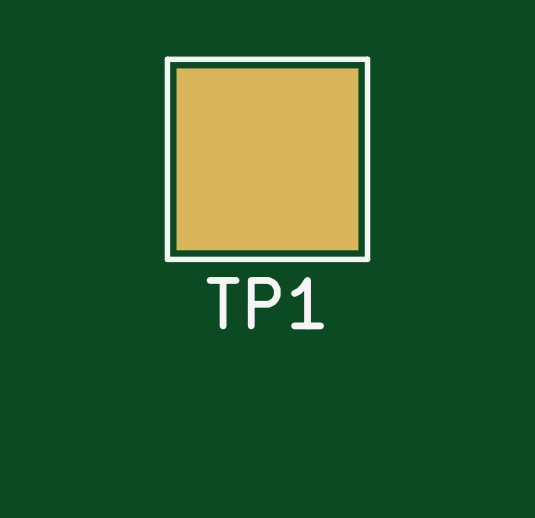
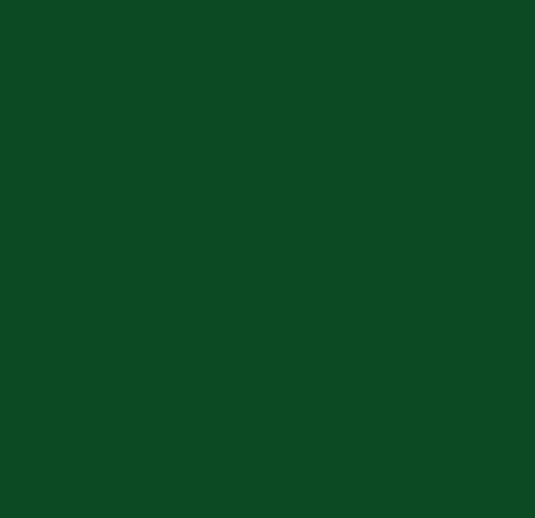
TP1: (267, 159) -> none

